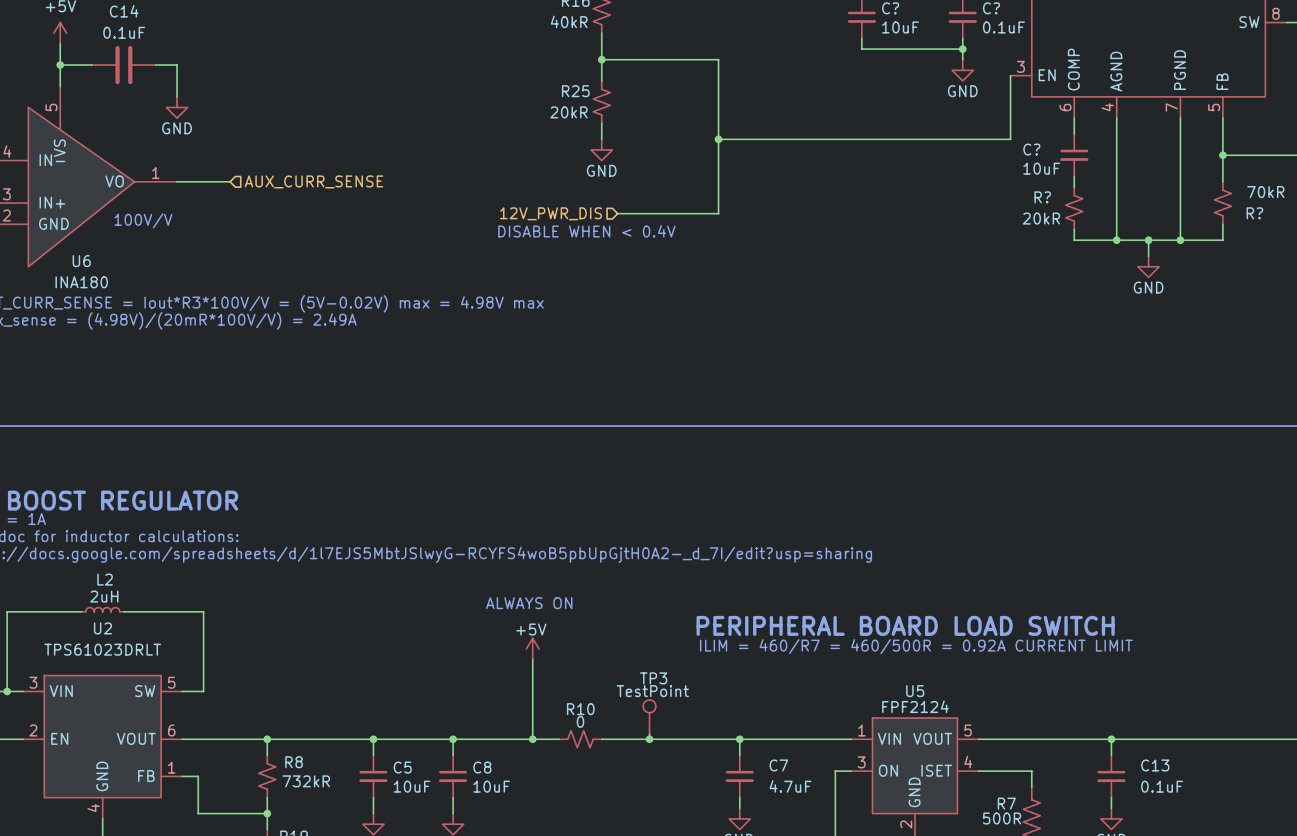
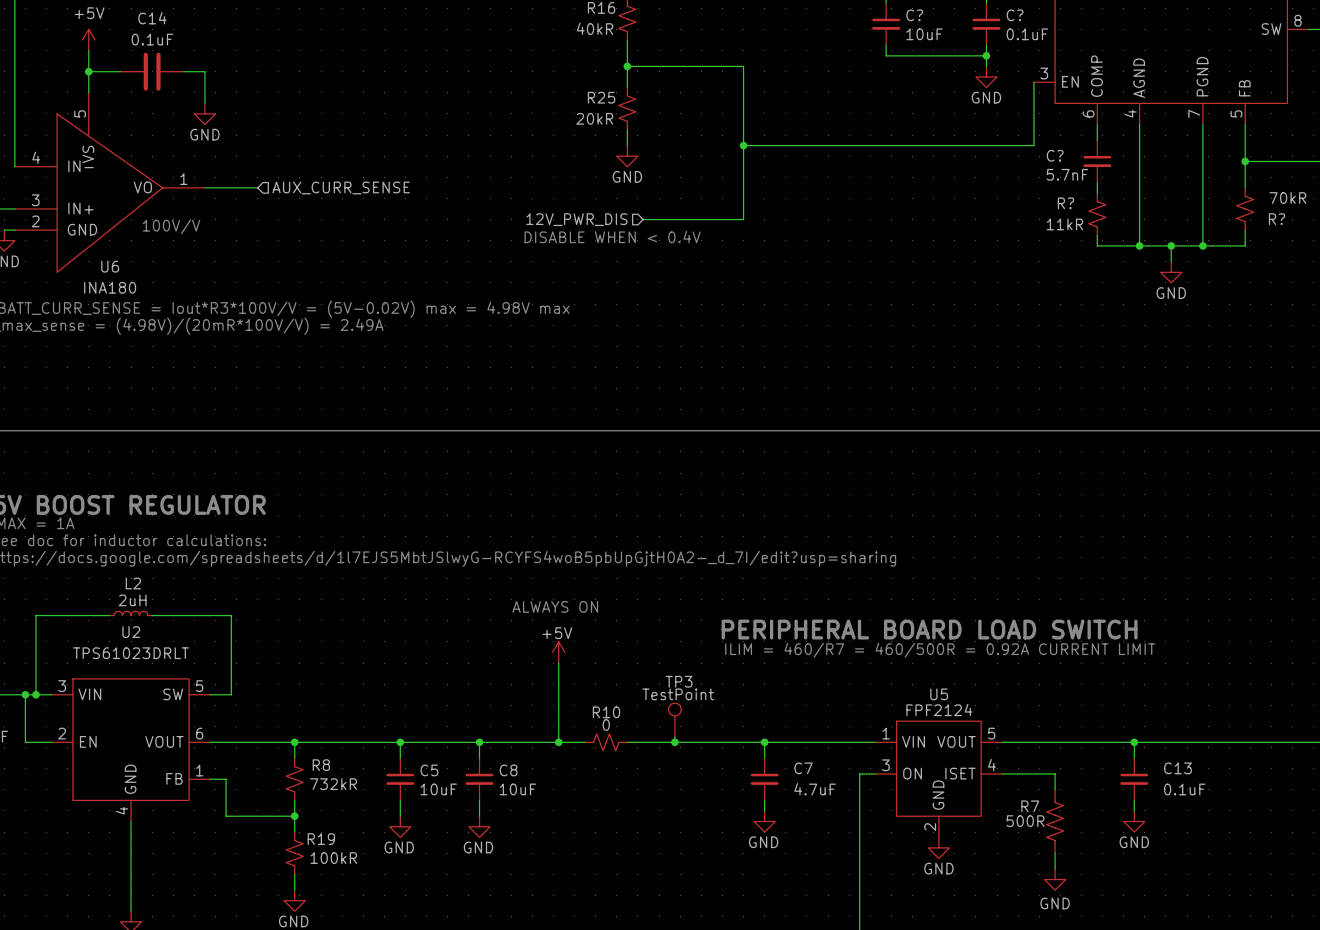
C? value: 10uF (1041, 168) -> 5.7nF (1067, 174)
R? value: 20kR (1041, 218) -> 11kR (1064, 224)

